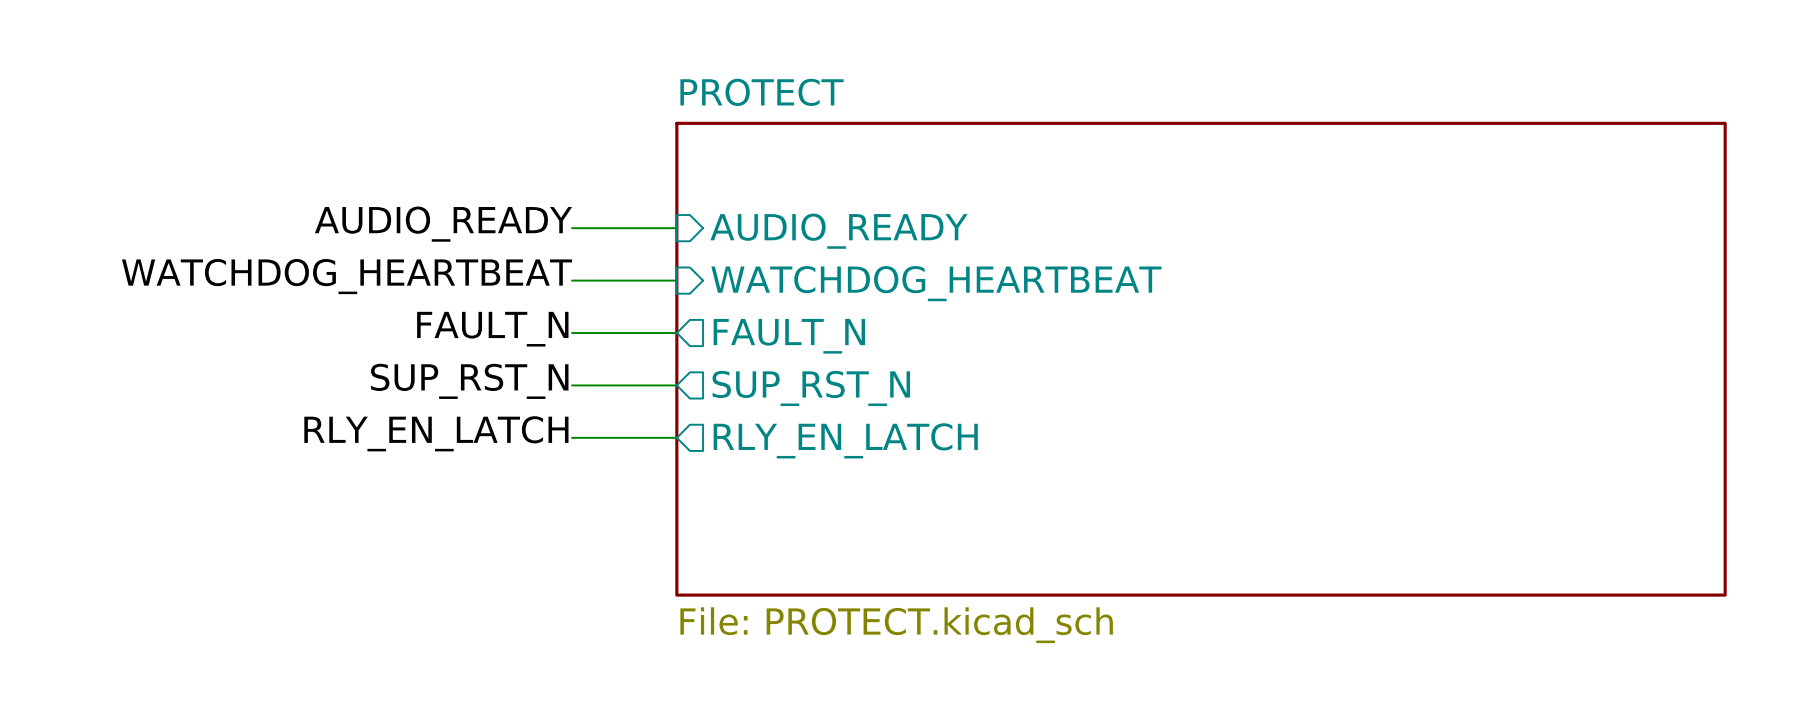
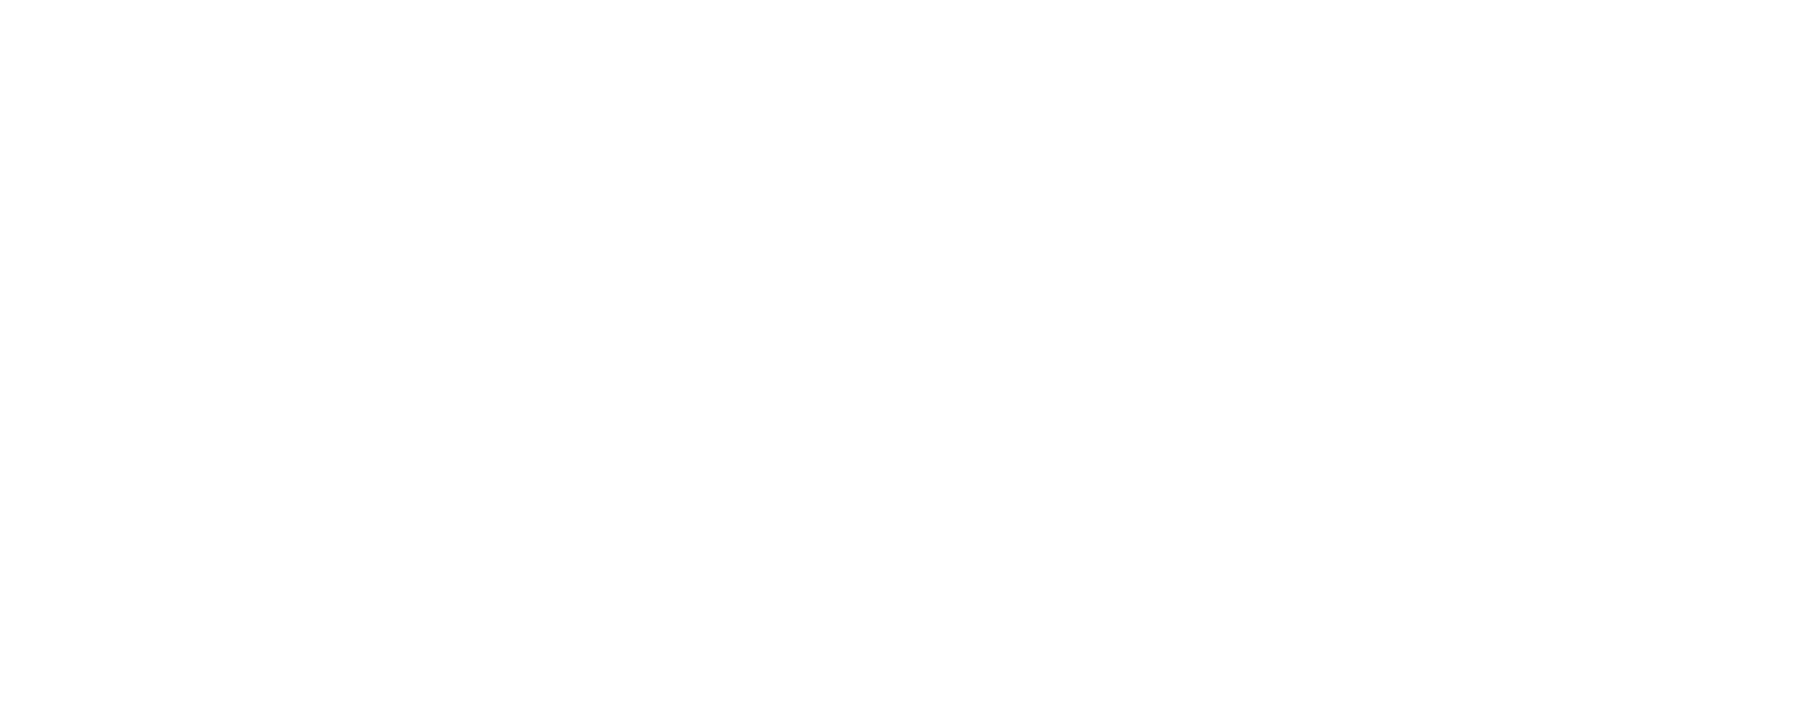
label: AUDIO_READY (443, 224) -> none
wire: (572, 228) (676, 228) -> none
sheet pin: AUDIO_READY (839, 231) -> none
label: WATCHDOG_HEARTBEAT (347, 276) -> none
wire: (572, 280) (676, 280) -> none
sheet pin: WATCHDOG_HEARTBEAT (936, 283) -> none
label: FAULT_N (492, 329) -> none
wire: (572, 333) (676, 333) -> none
sheet pin: FAULT_N (789, 336) -> none
sheet PROTECT: File: PROTECT.kicad_sch (1201, 359) -> none
label: SUP_RST_N (469, 381) -> none
wire: (572, 385) (676, 385) -> none
sheet pin: SUP_RST_N (811, 388) -> none
label: RLY_EN_LATCH (436, 433) -> none
wire: (572, 437) (676, 437) -> none
sheet pin: RLY_EN_LATCH (845, 440) -> none

